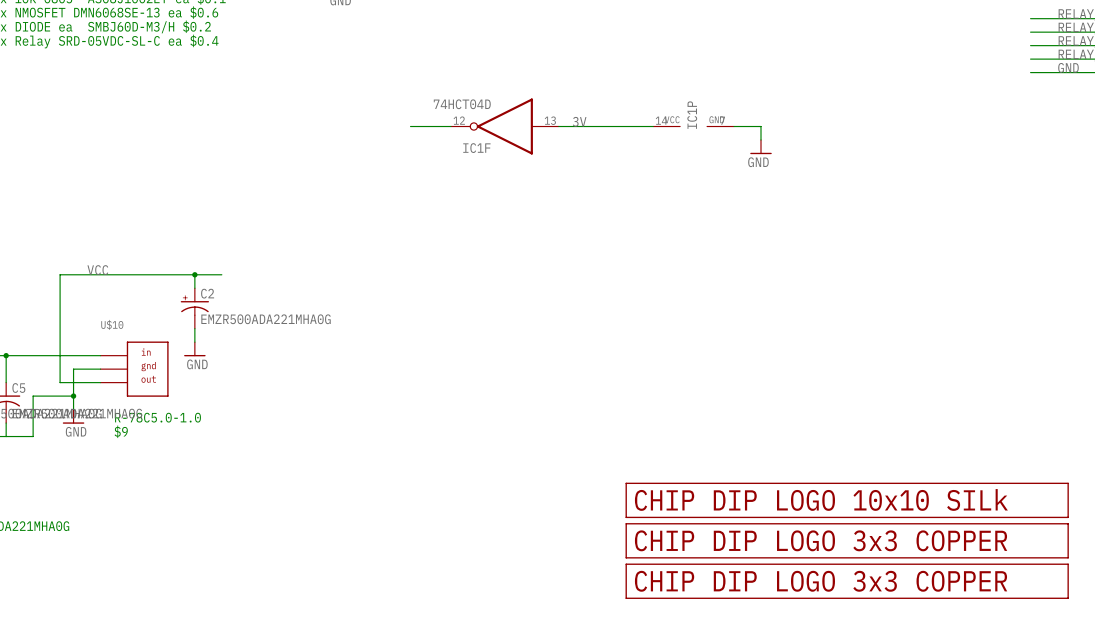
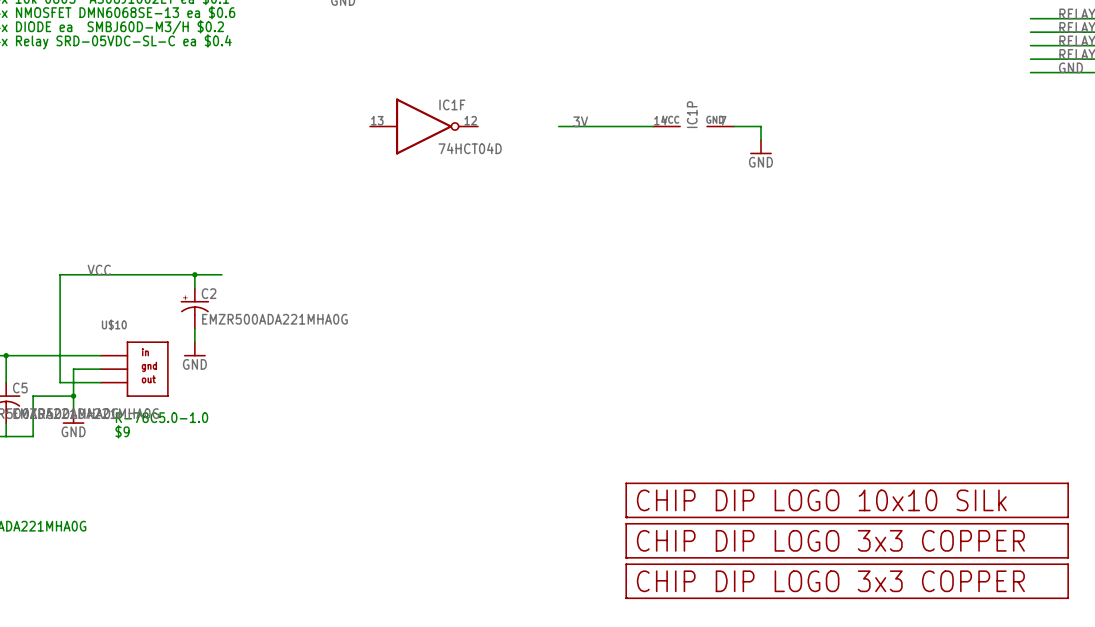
wire: (410, 126) (450, 126) -> none
IC1F rotation: 0° (504, 126) -> 180° (424, 126)
IC1F position: (504, 126) -> (424, 126)

